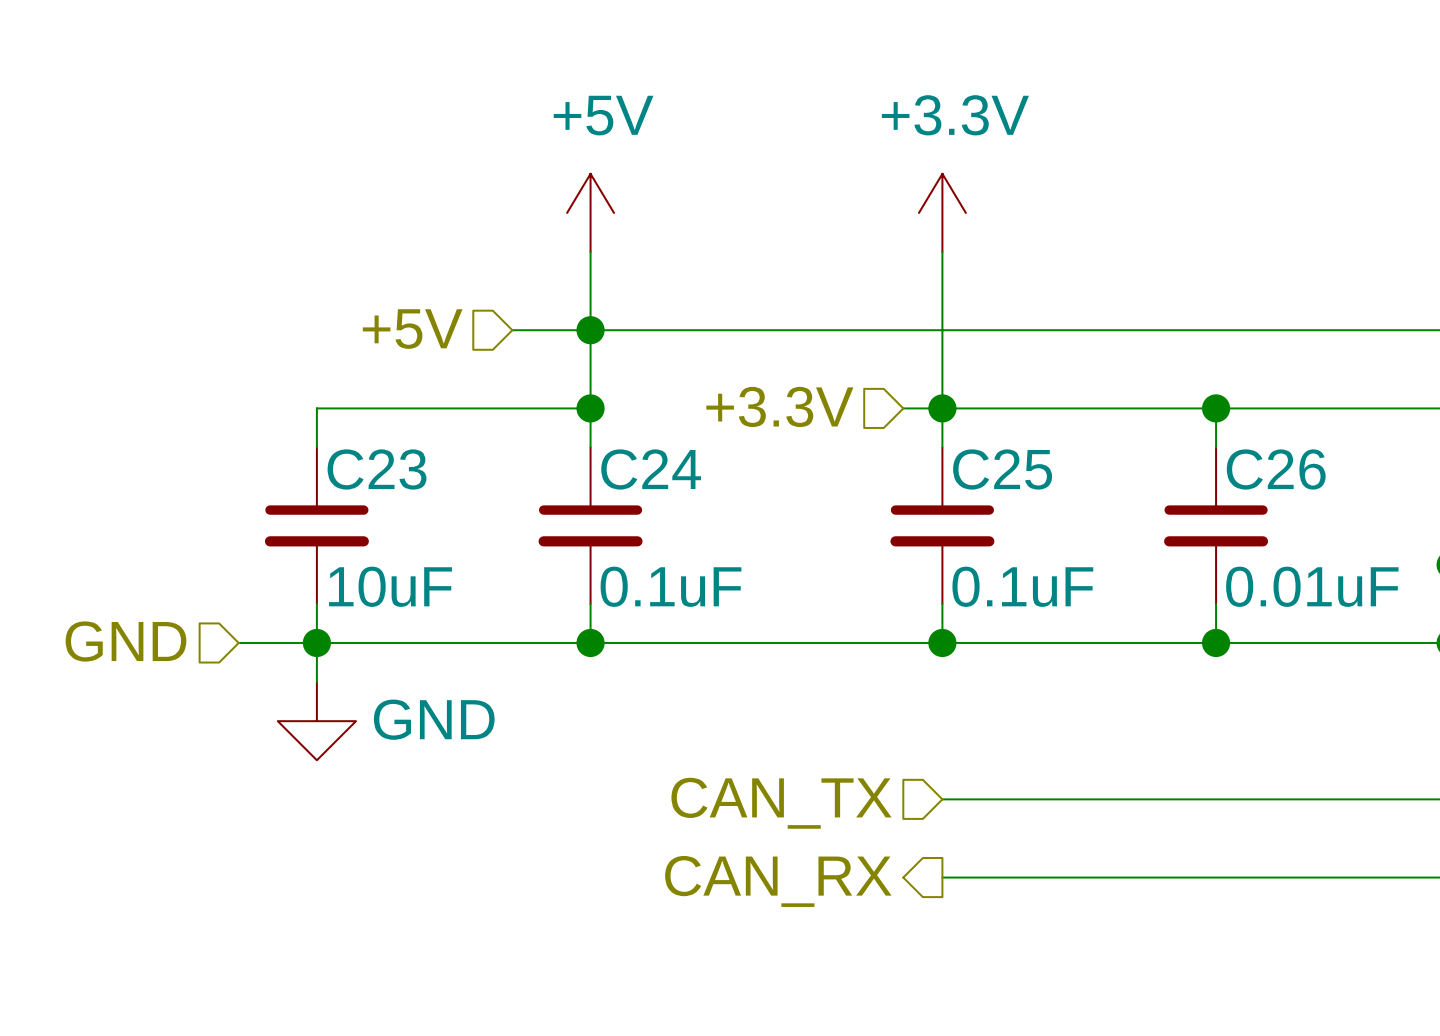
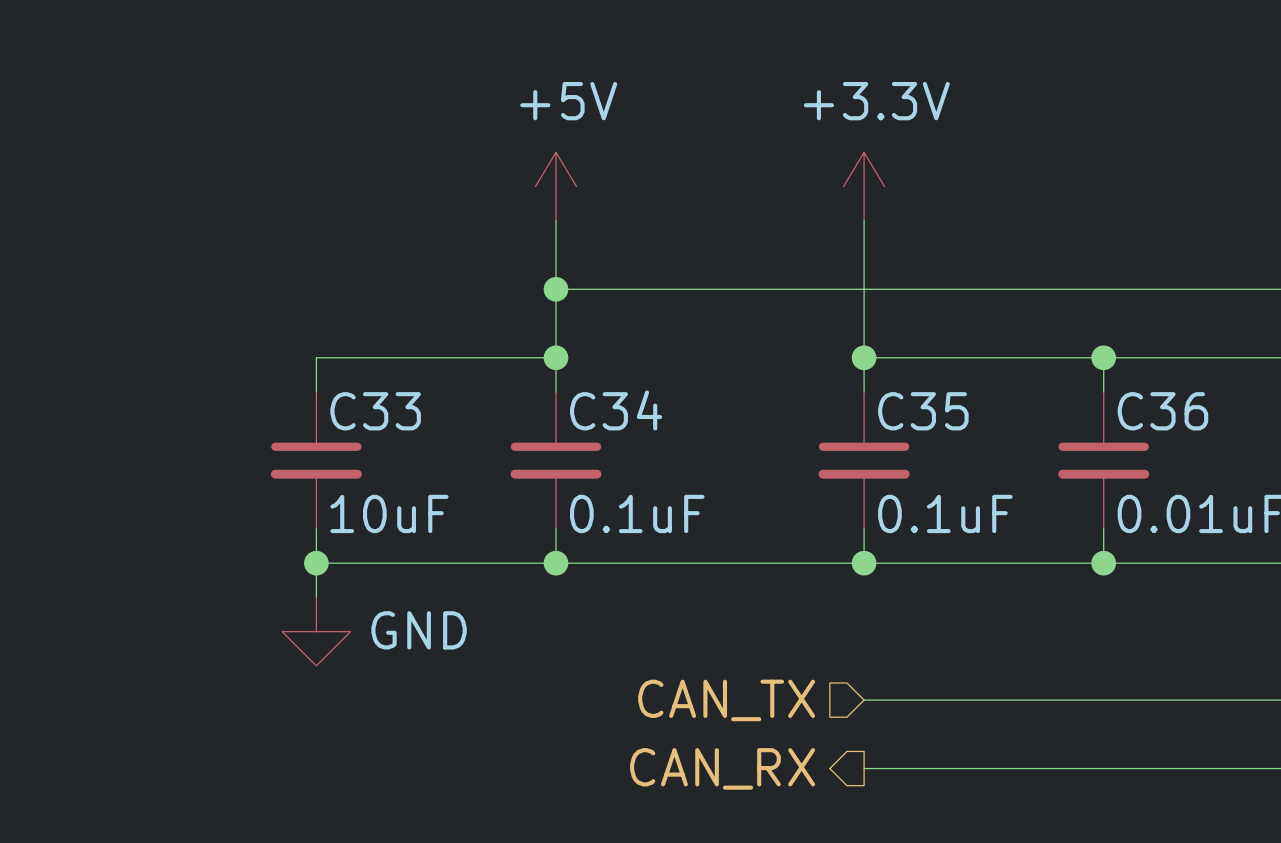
hierarchical label: +5V (412, 329) -> none
wire: (512, 330) (590, 330) -> none
hierarchical label: +3.3V (779, 406) -> none
wire: (903, 408) (942, 408) -> none
C23 name: C23 (377, 469) -> C33 (375, 411)
C24 name: C24 (651, 469) -> C34 (616, 410)
C25 name: C25 (1002, 469) -> C35 (923, 411)
C26 name: C26 (1276, 469) -> C36 (1162, 411)
hierarchical label: GND (125, 641) -> none
wire: (238, 642) (316, 642) -> none

